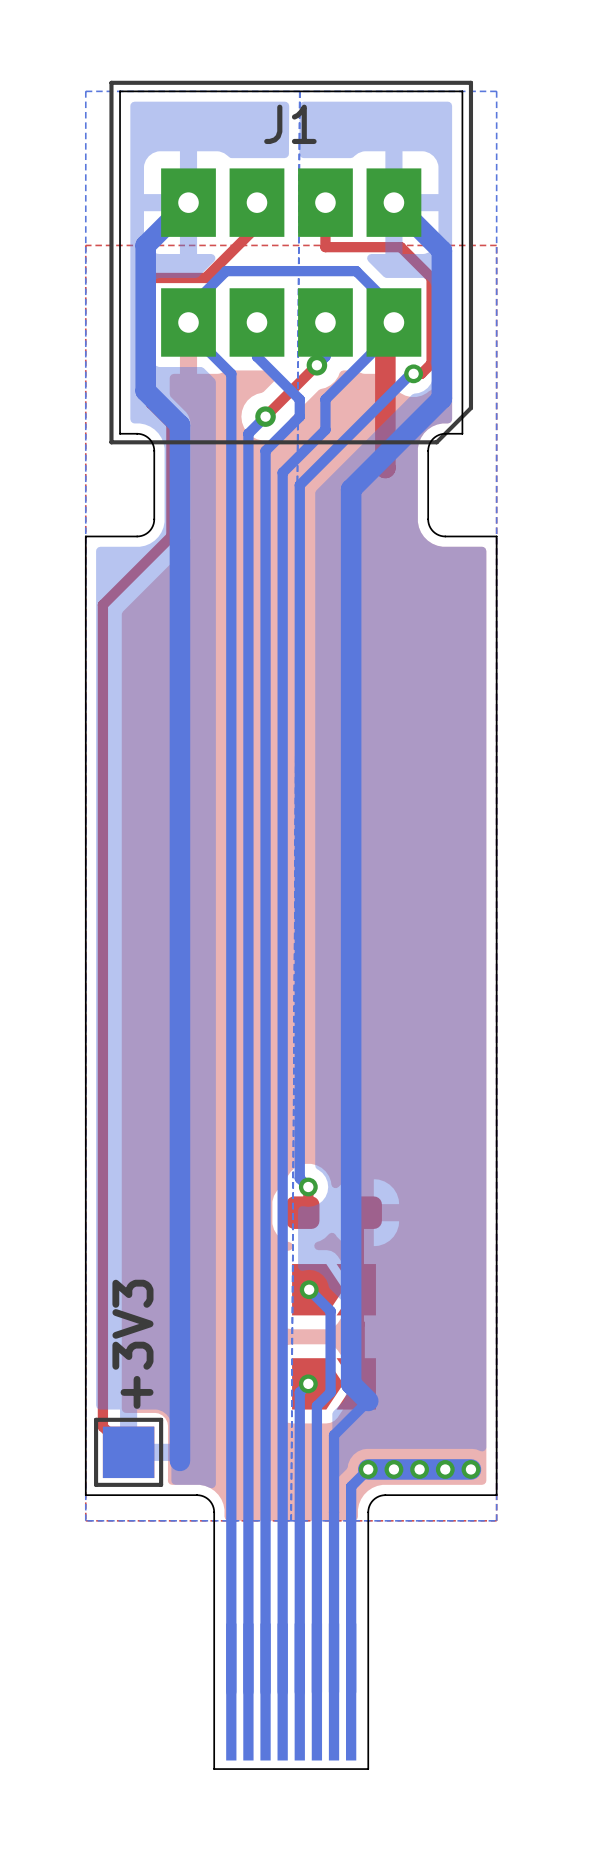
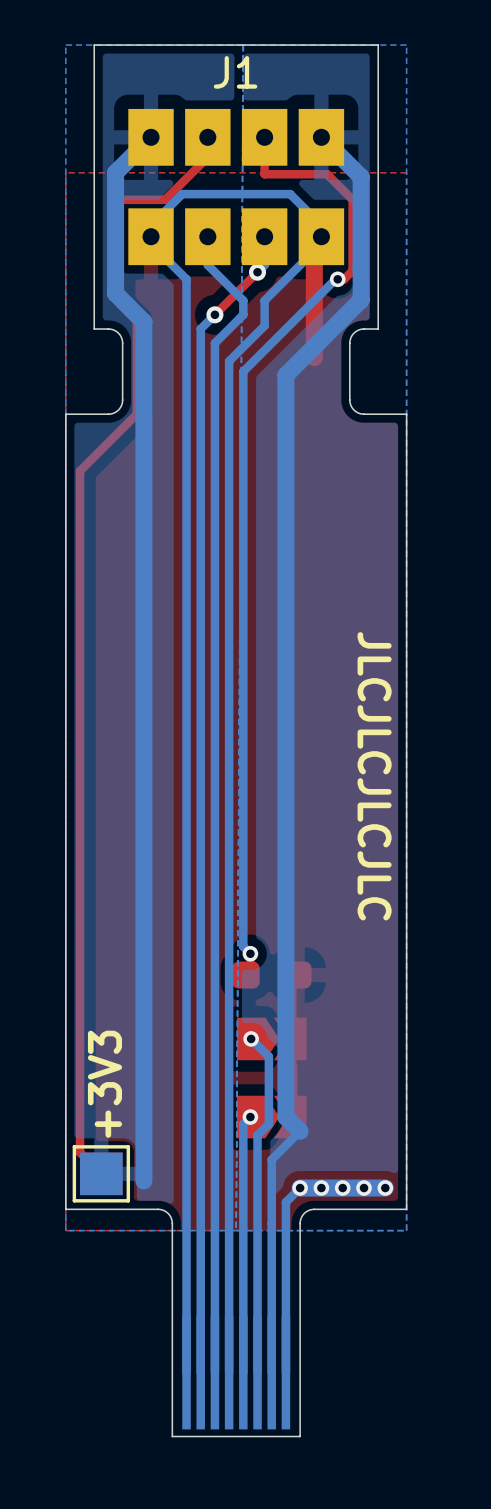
J1 footprint: [109, 80, 474, 445] -> [128, 108, 345, 266]
text: none -> JLCJLCJLCJLC (374, 776)

